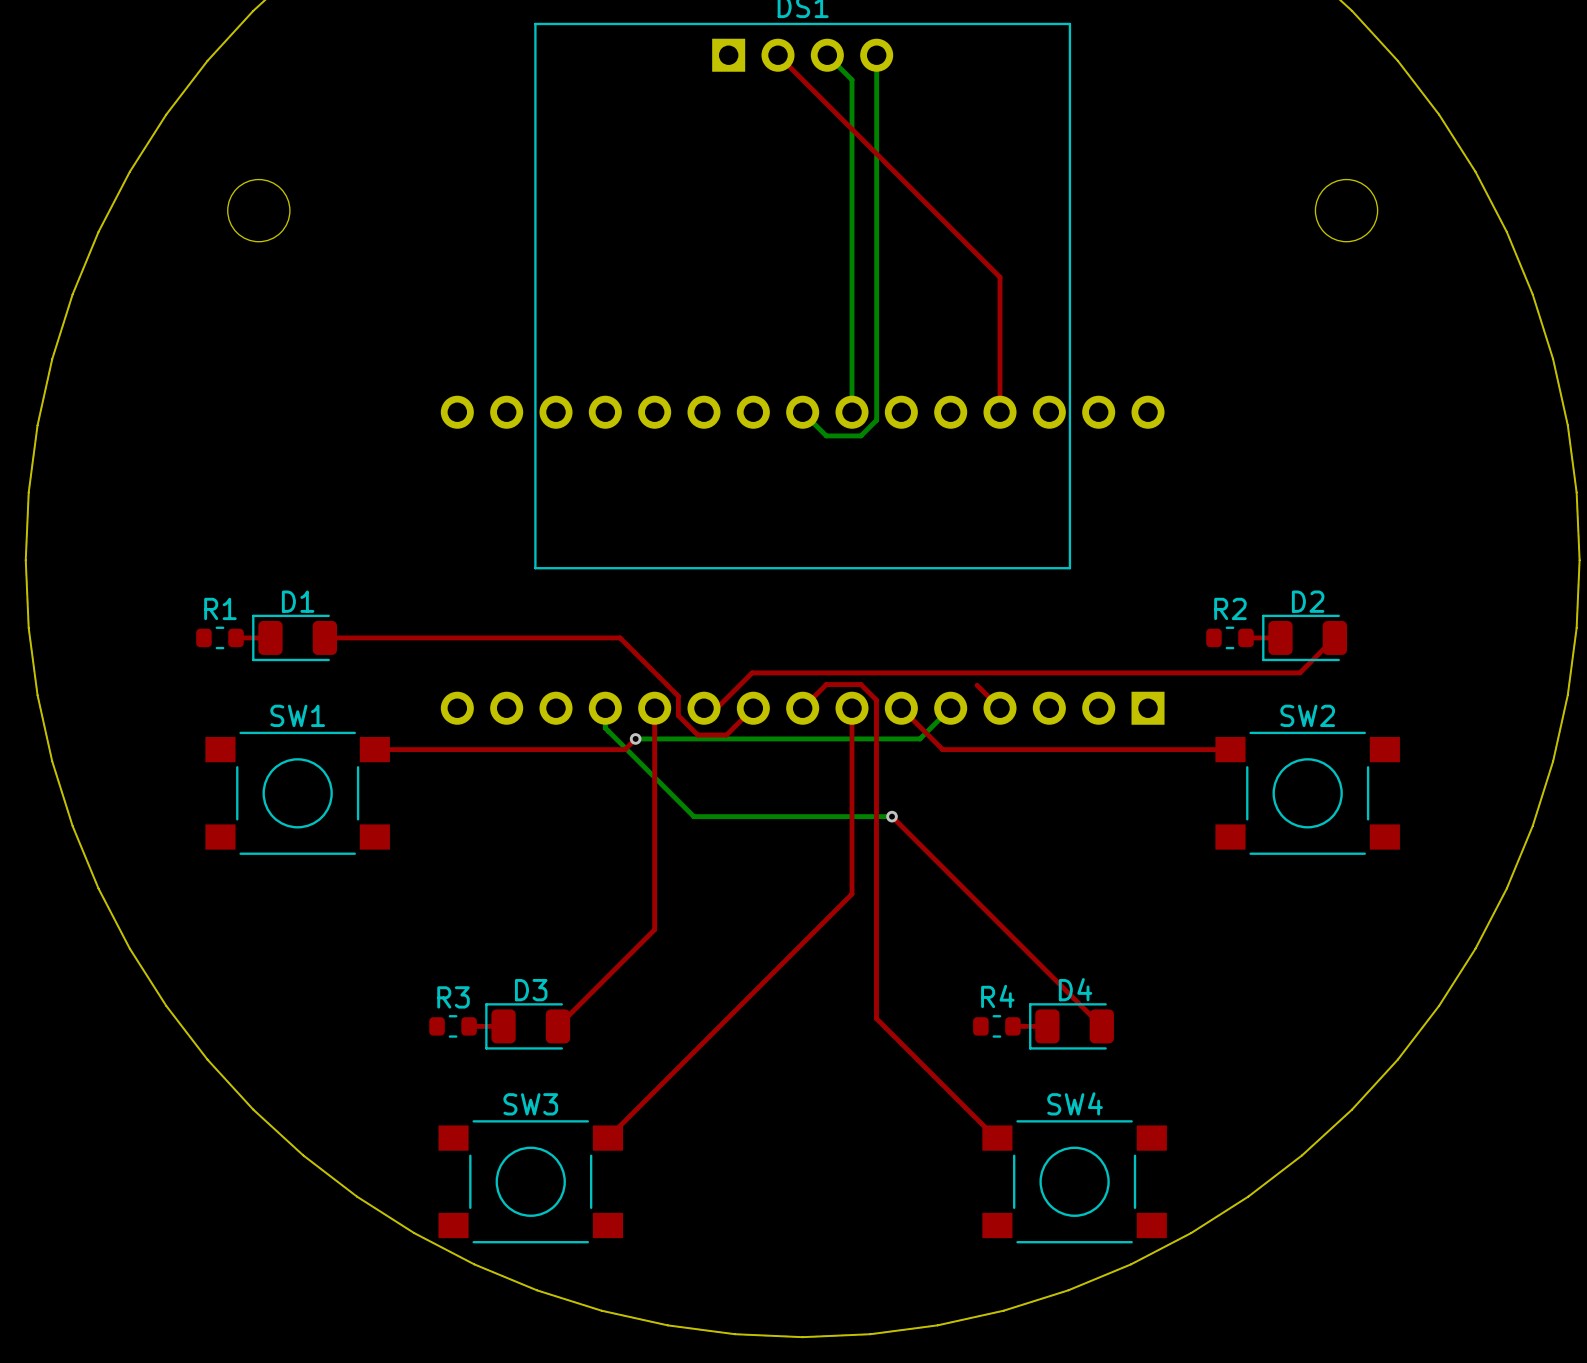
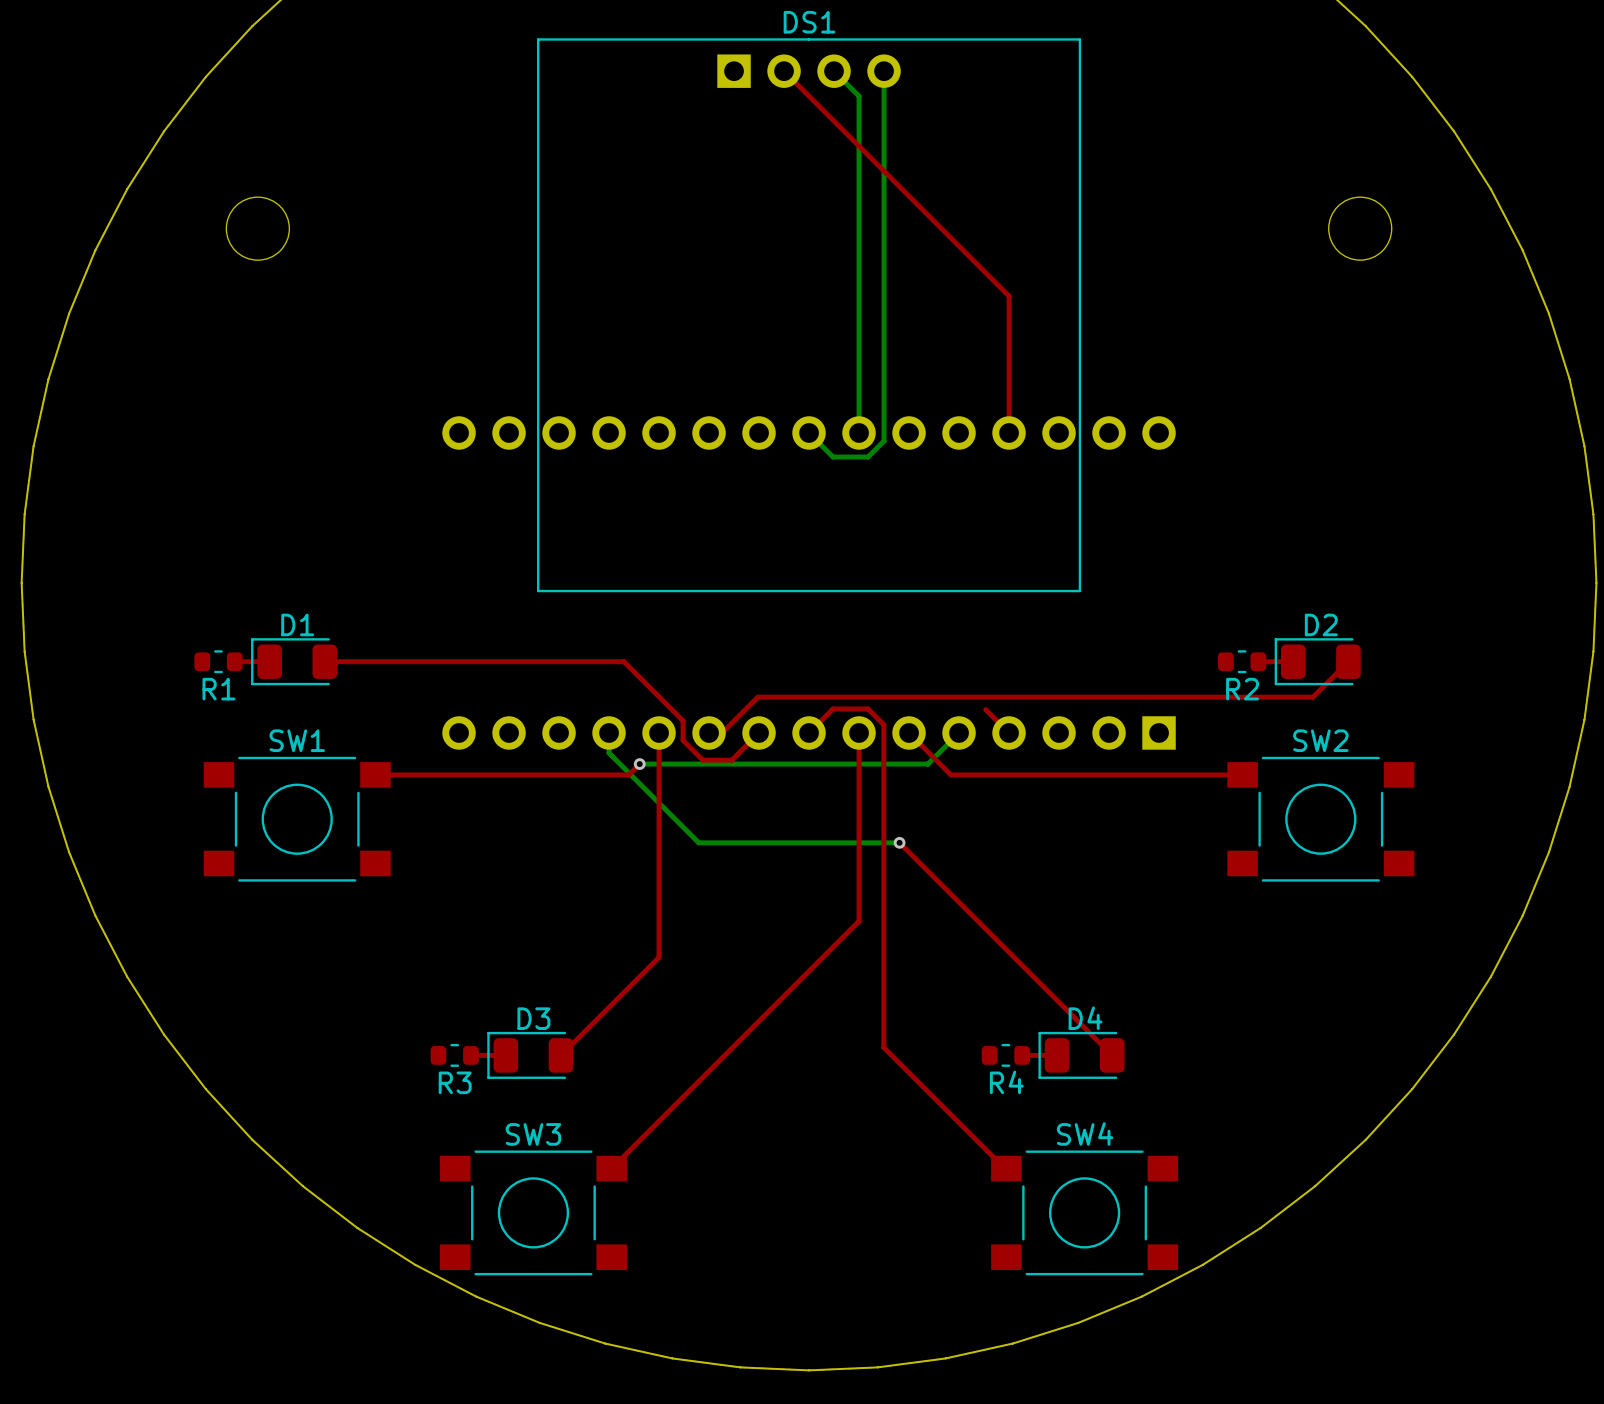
R1 name position: R1 (220, 608) -> R1 (218, 689)
R2 name position: R2 (1230, 608) -> R2 (1242, 689)
R4 name position: R4 (997, 996) -> R4 (1006, 1082)
R3 name position: R3 (453, 997) -> R3 (455, 1082)

